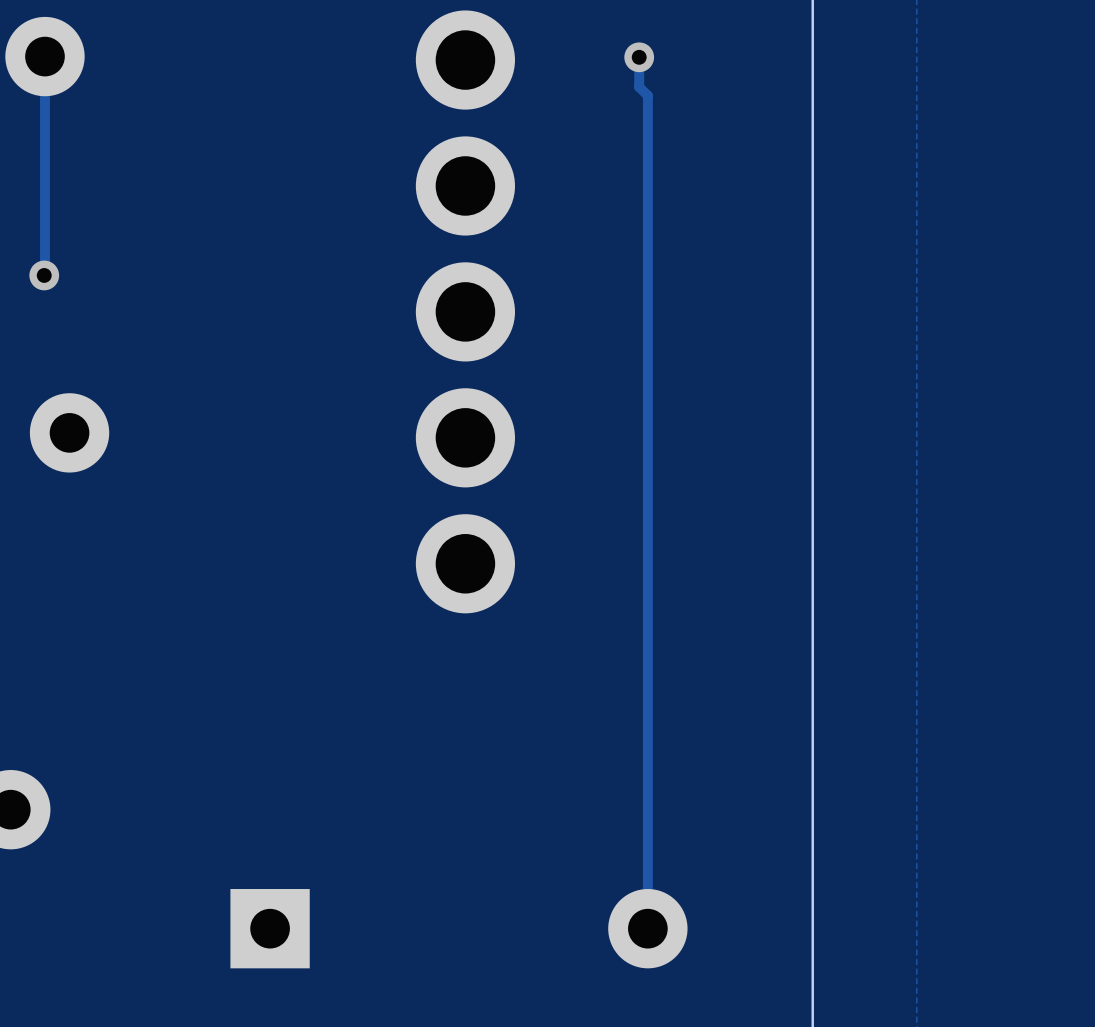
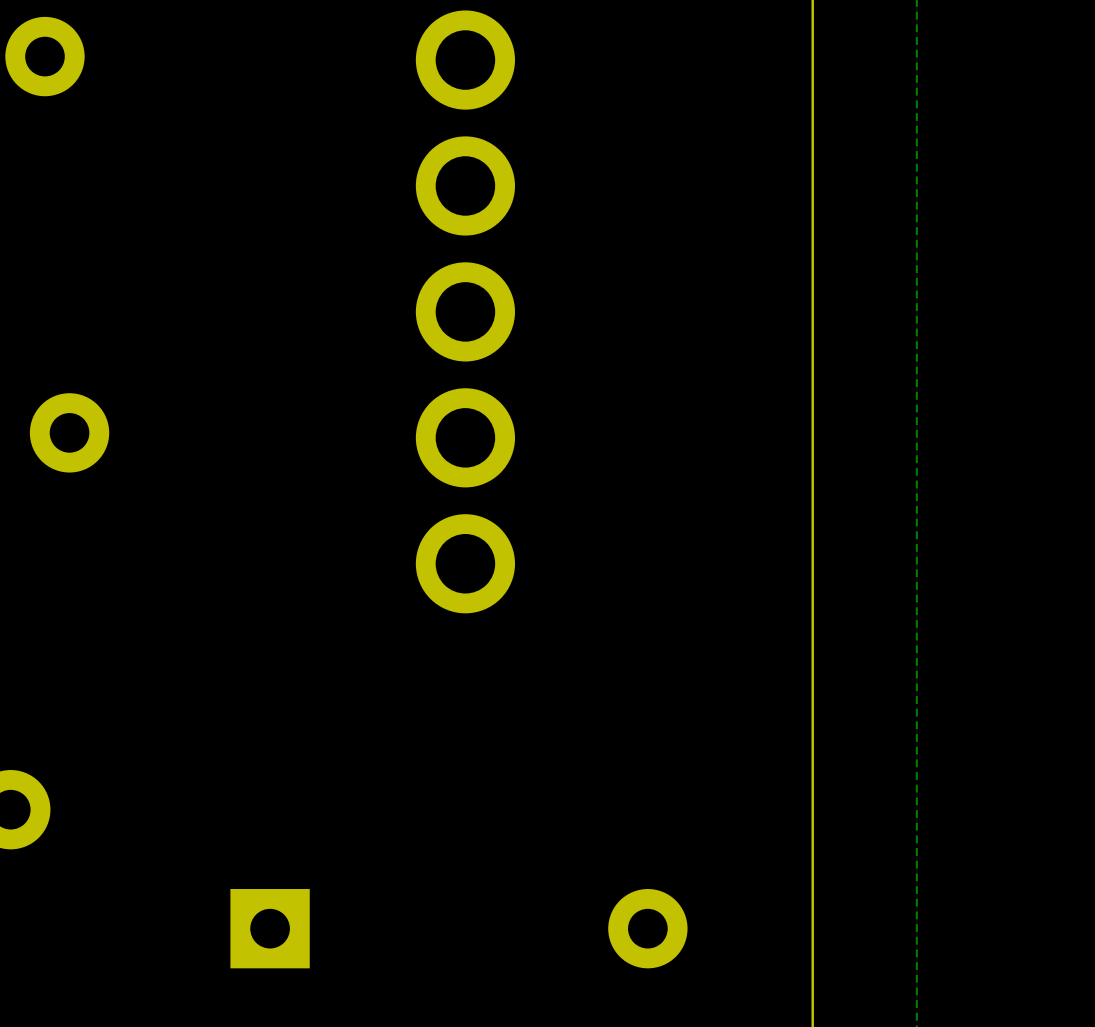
track: (44, 56) (44, 275) -> none
track: (639, 57) (639, 87) (647, 95) (647, 928) -> none
via: (639, 57) -> none
via: (44, 275) -> none

